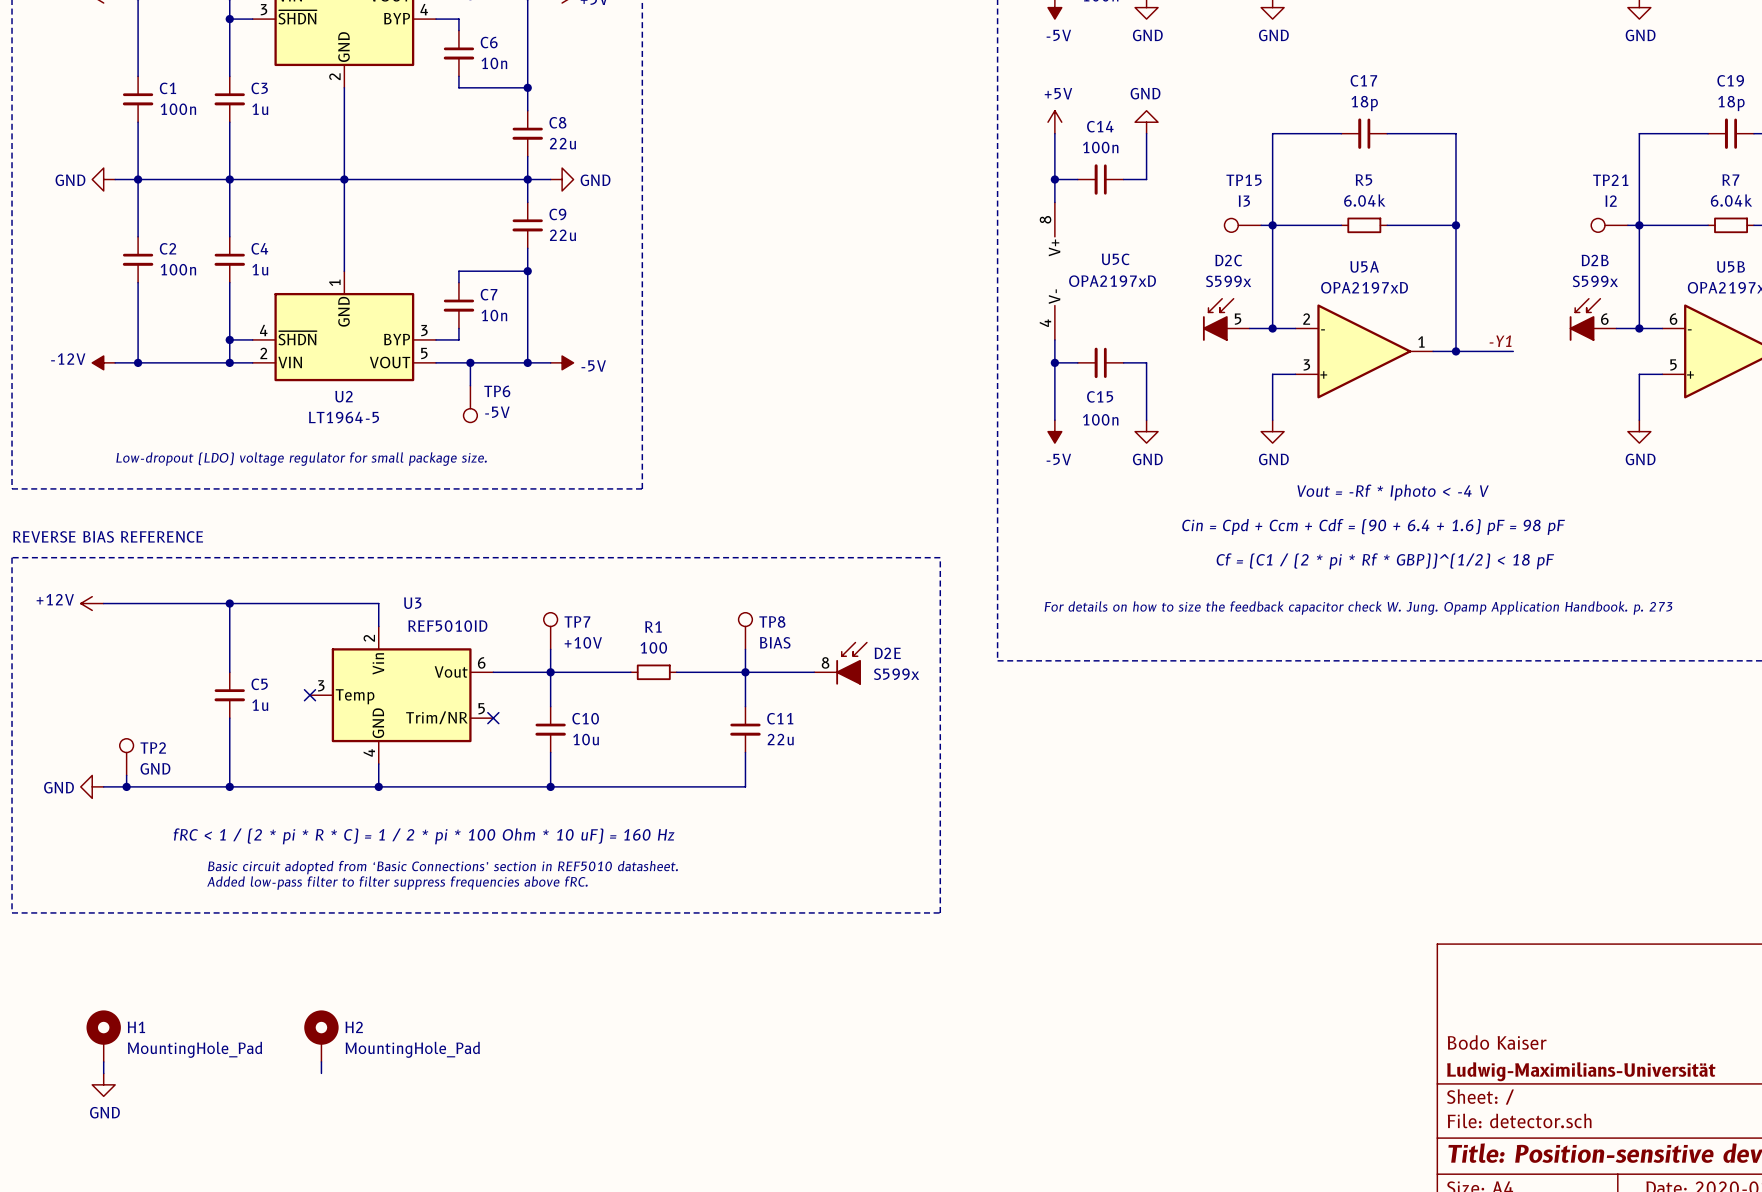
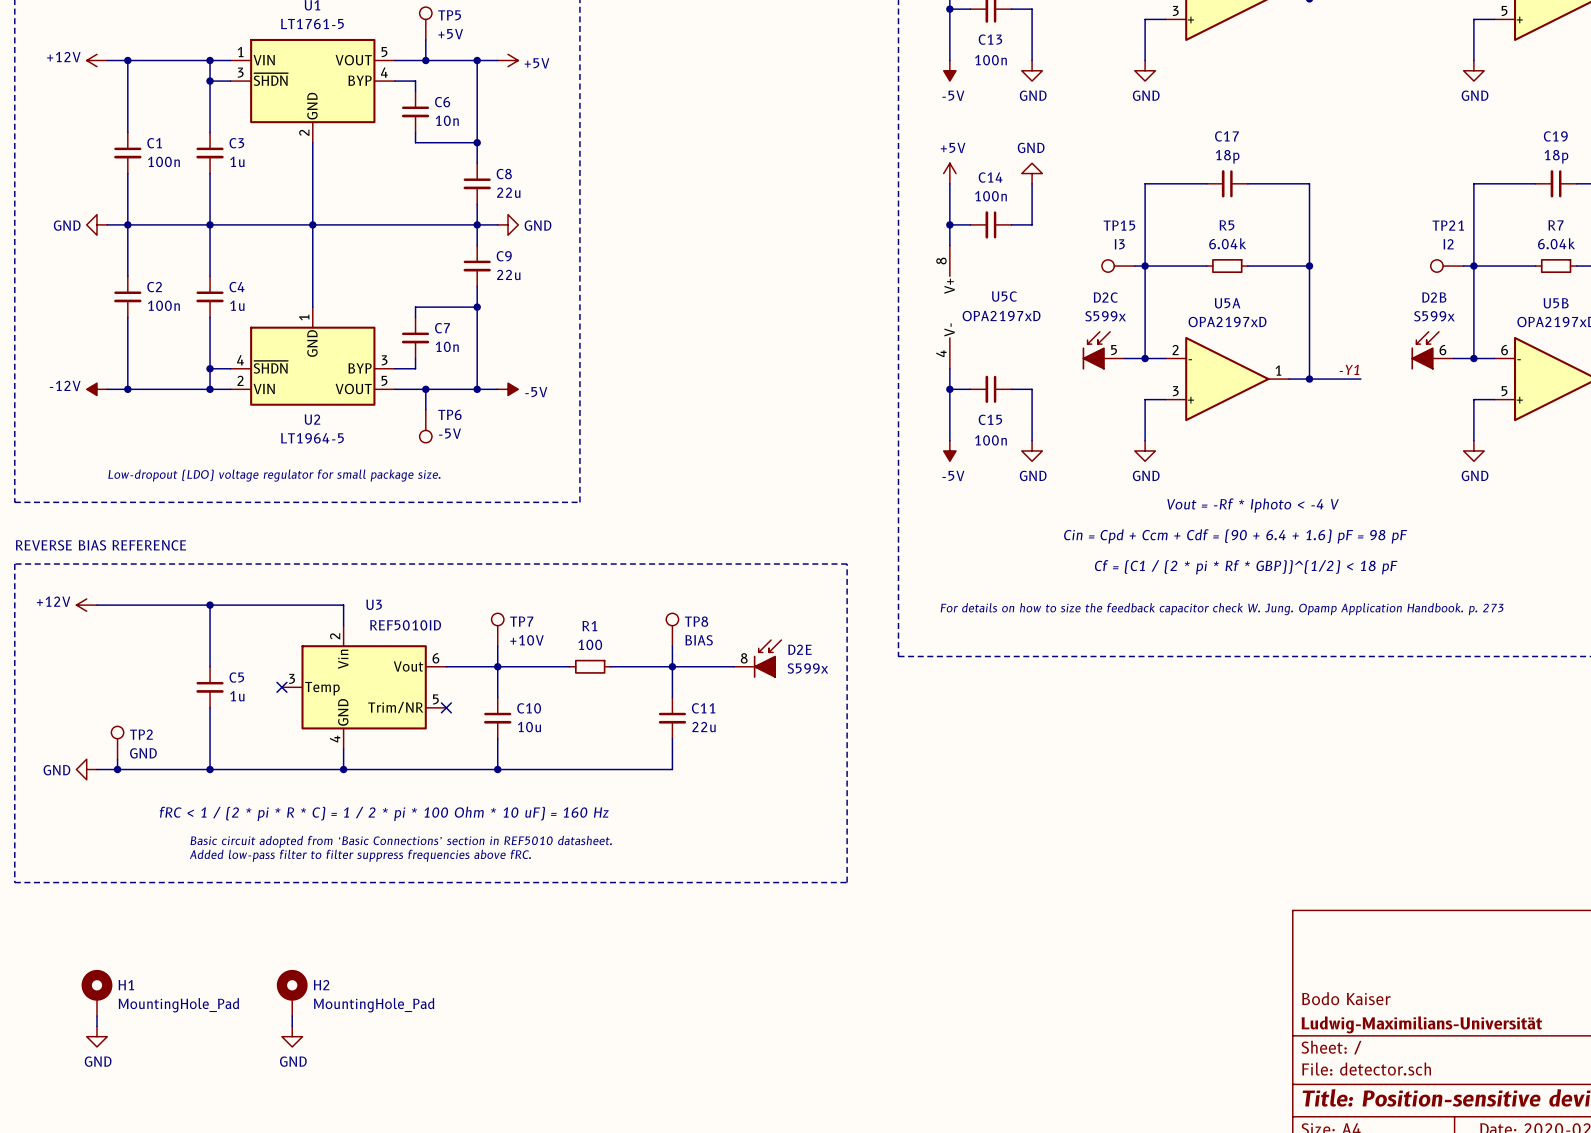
power symbol: none -> GND (292, 1036)

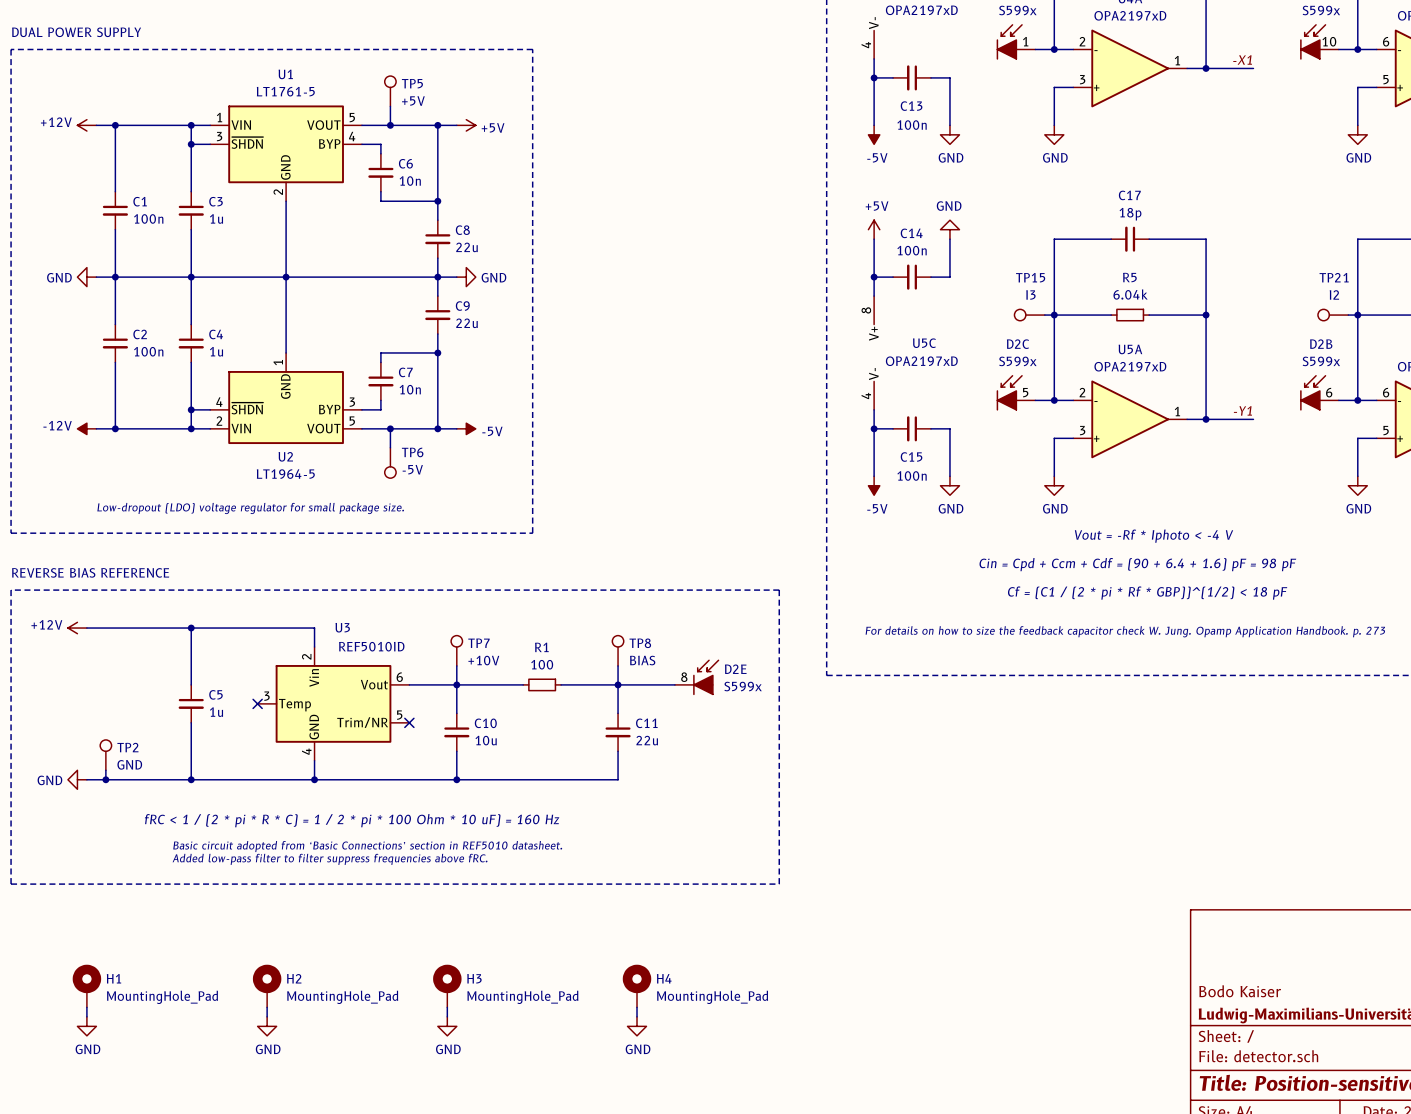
H3: none -> MountingHole_Pad (447, 986)
H4: none -> MountingHole_Pad (637, 986)
wire: none -> (447, 1007) (447, 1016)
wire: none -> (637, 1007) (637, 1016)
power symbol: none -> GND (447, 1026)
power symbol: none -> GND (637, 1026)

